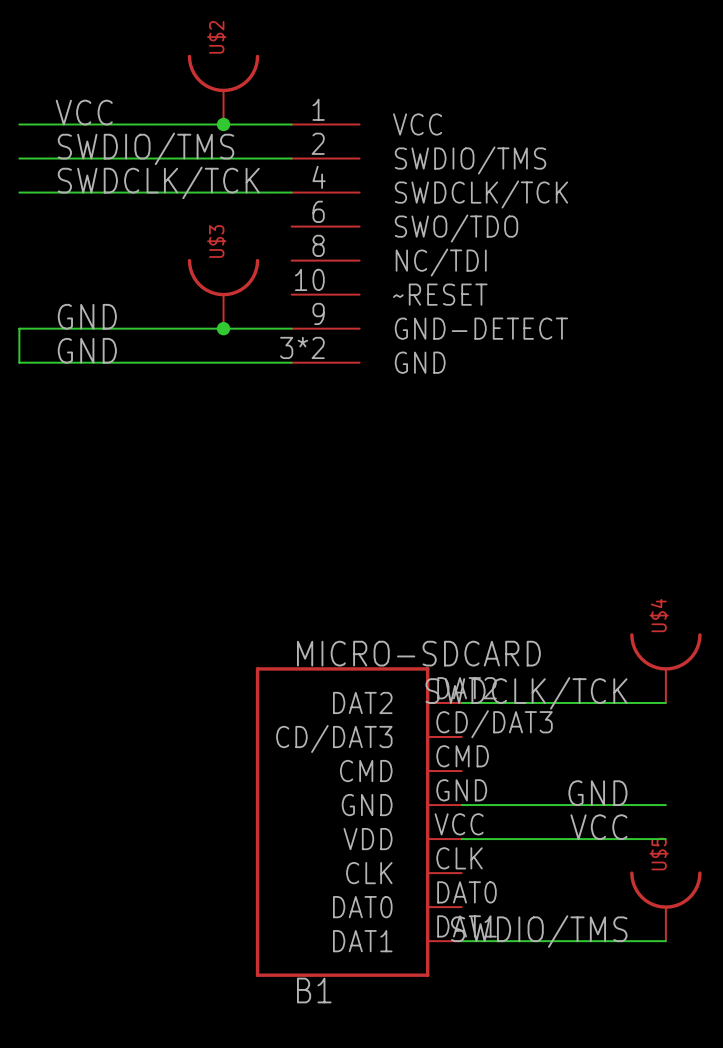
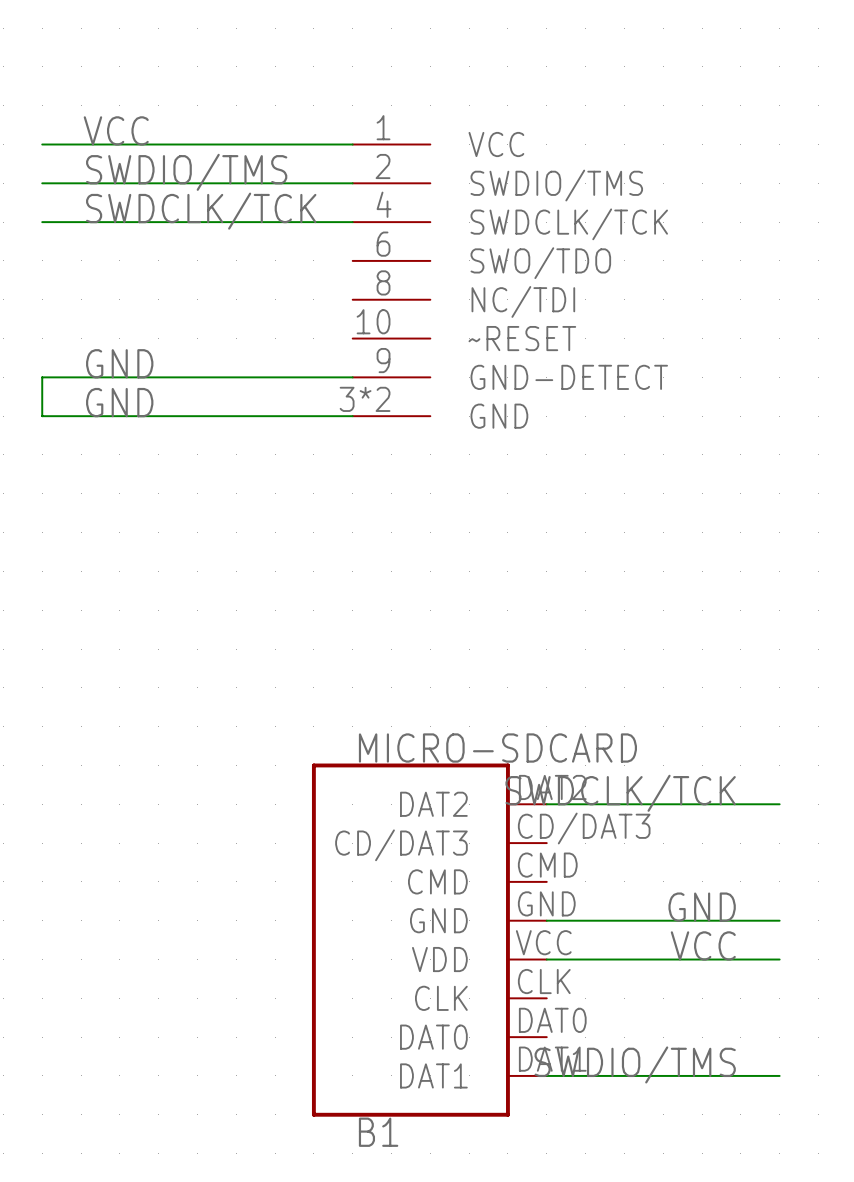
U$2: (223, 89) -> none
junction: (223, 124) -> none
U$3: (223, 293) -> none
junction: (223, 328) -> none
U$4: (665, 668) -> none
U$5: (665, 906) -> none

